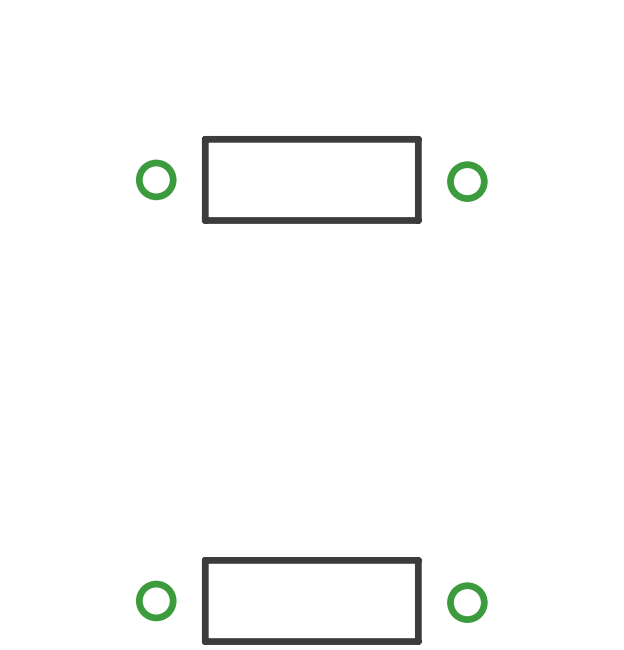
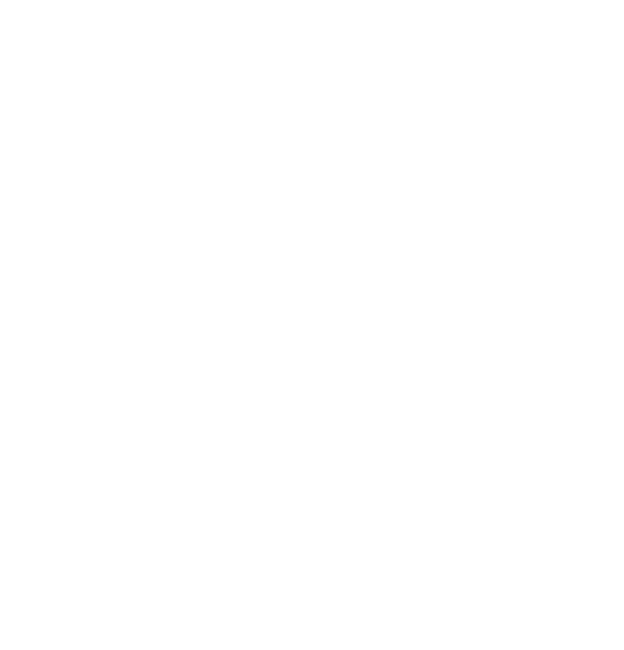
part: (311, 179) -> none
part: (311, 600) -> none

